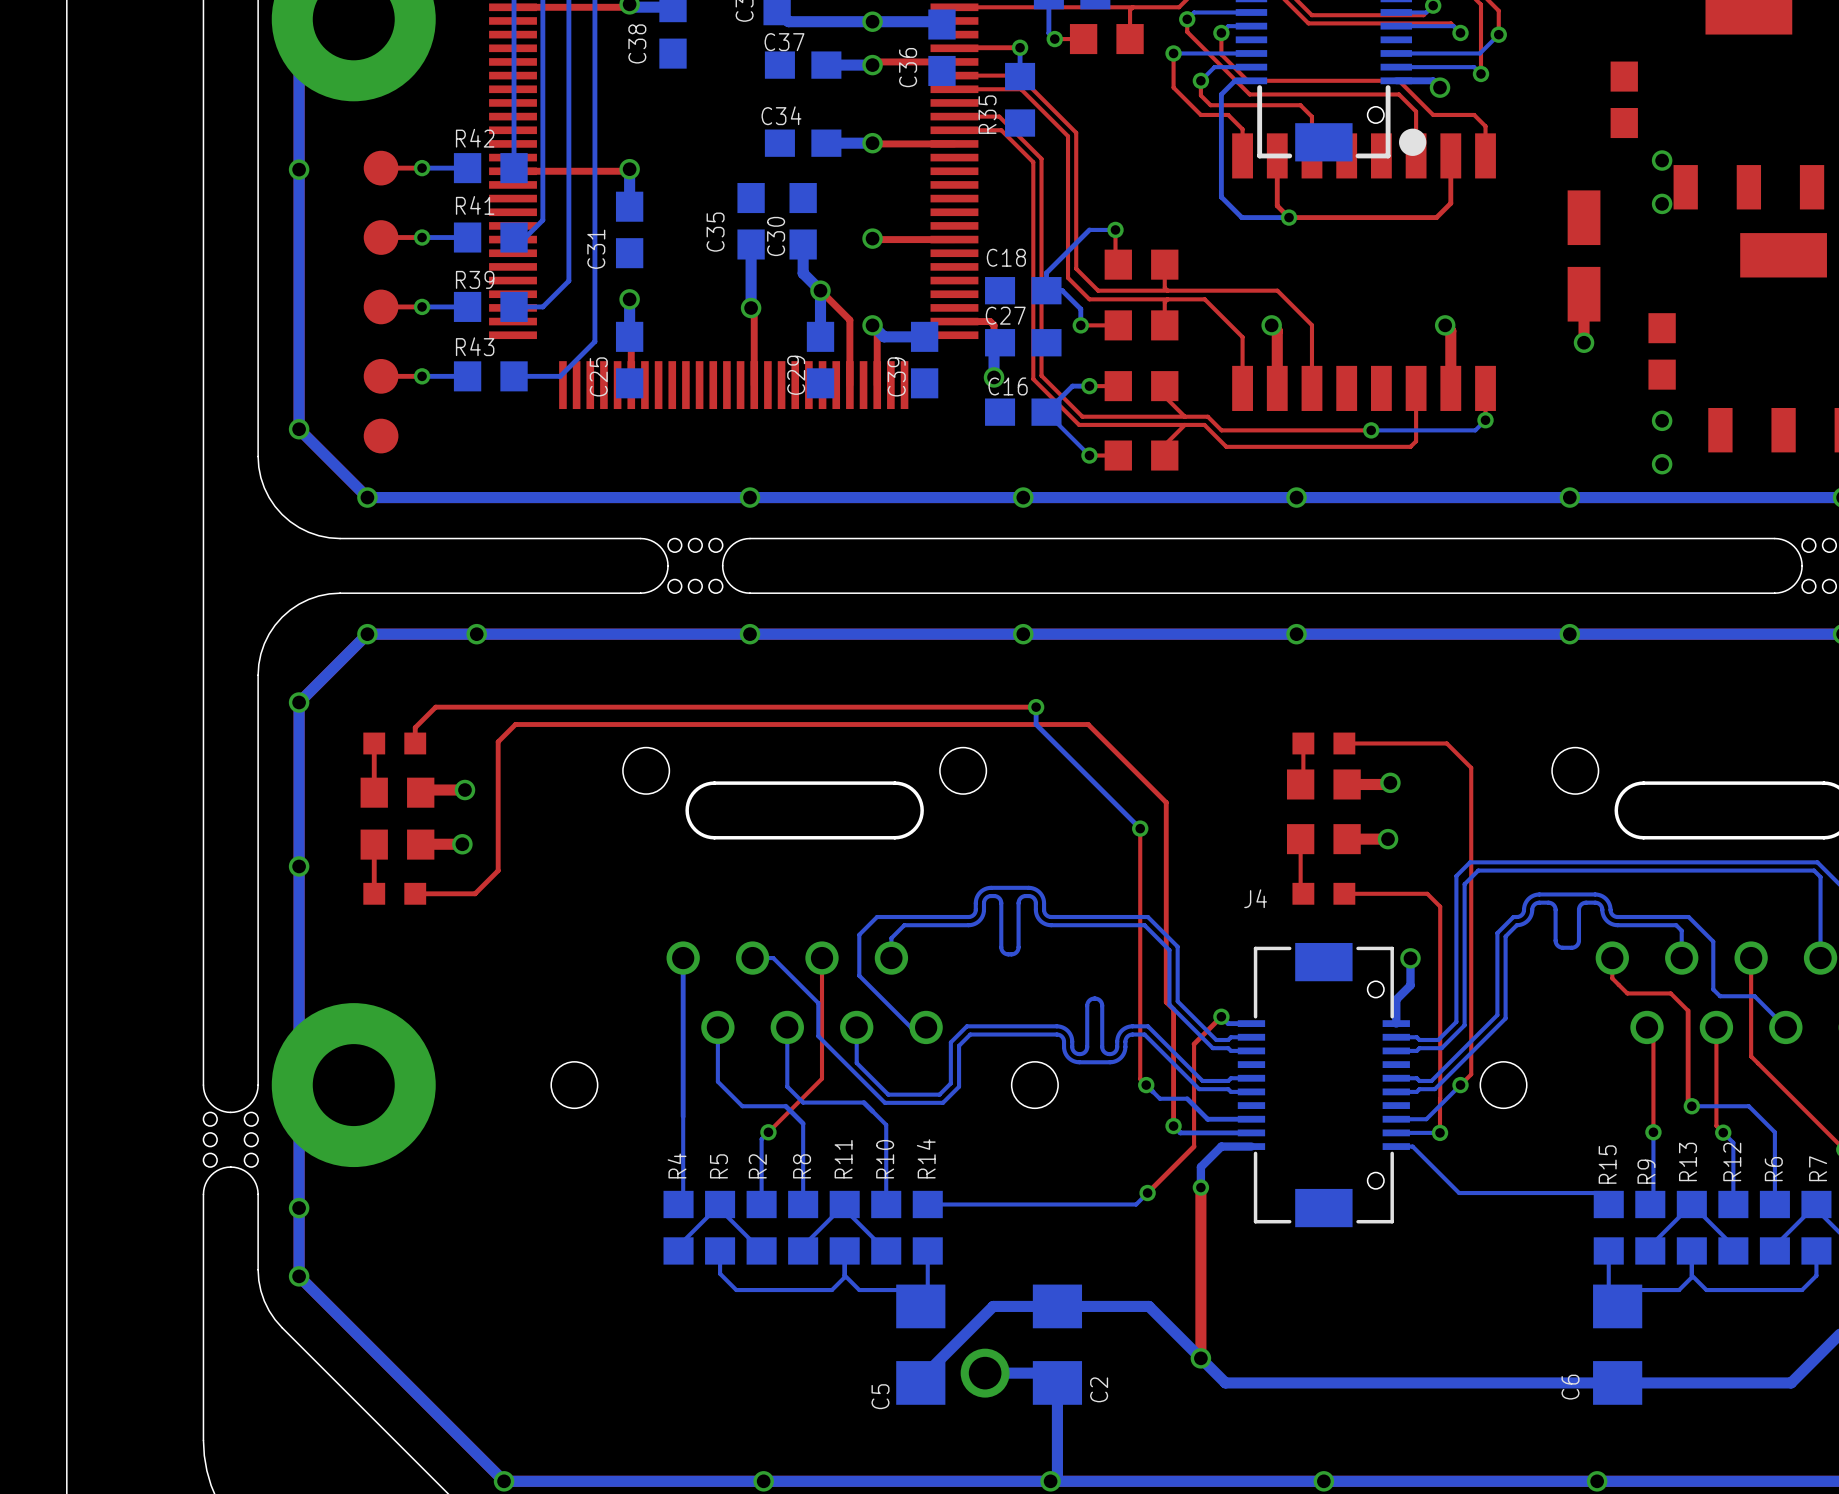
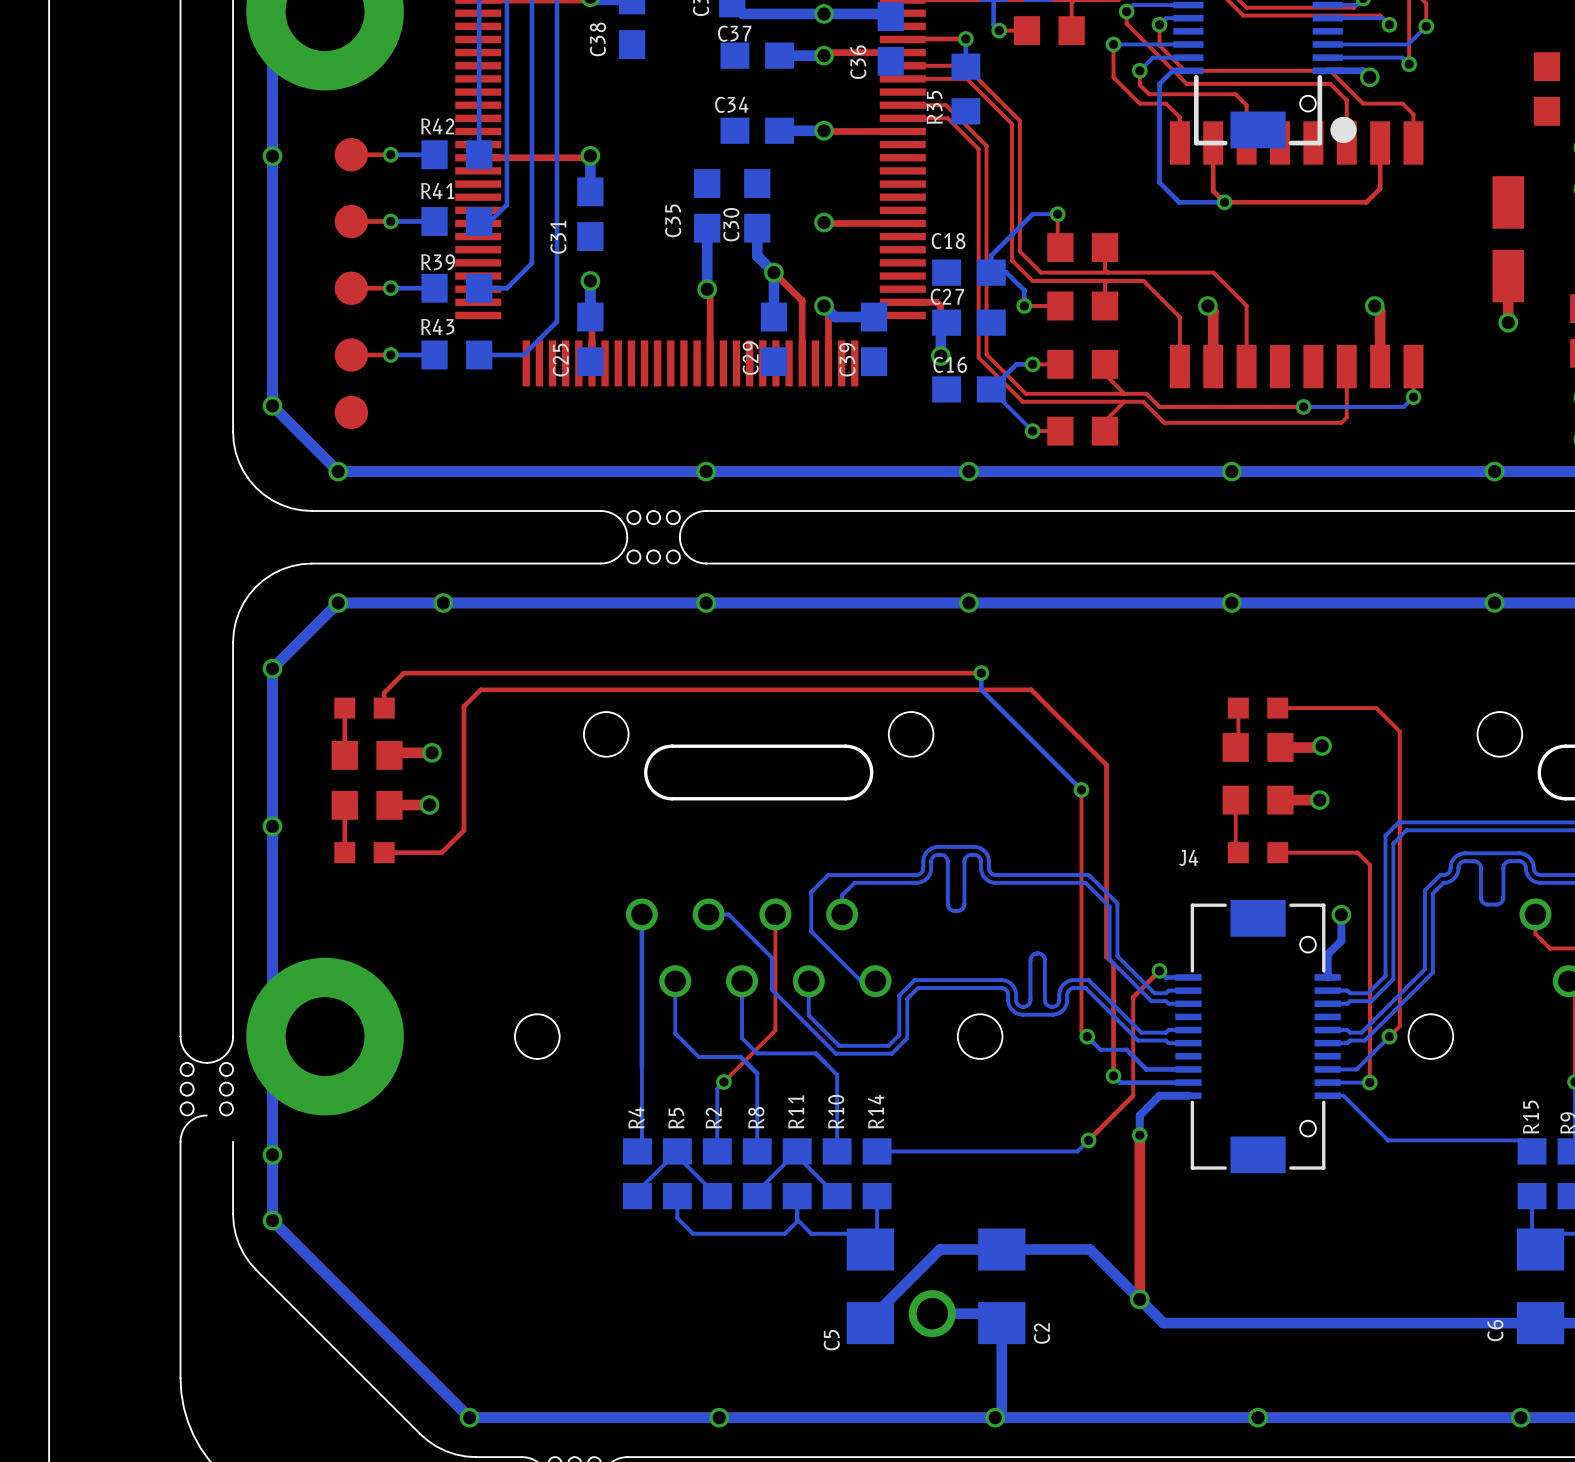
board edge: (230, 1167) (241, 1169) (250, 1175) (256, 1183) (258, 1194) -> none

